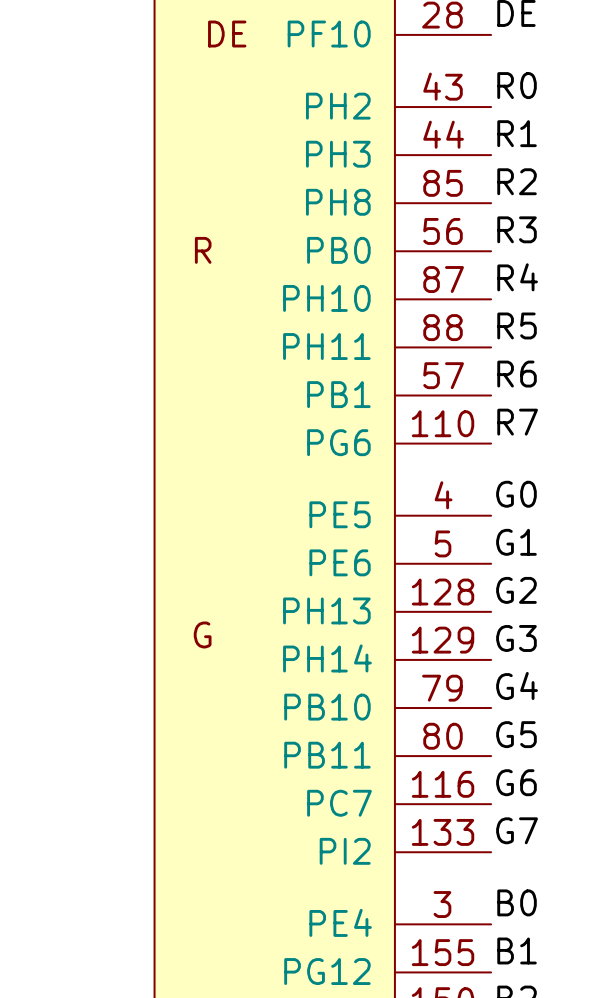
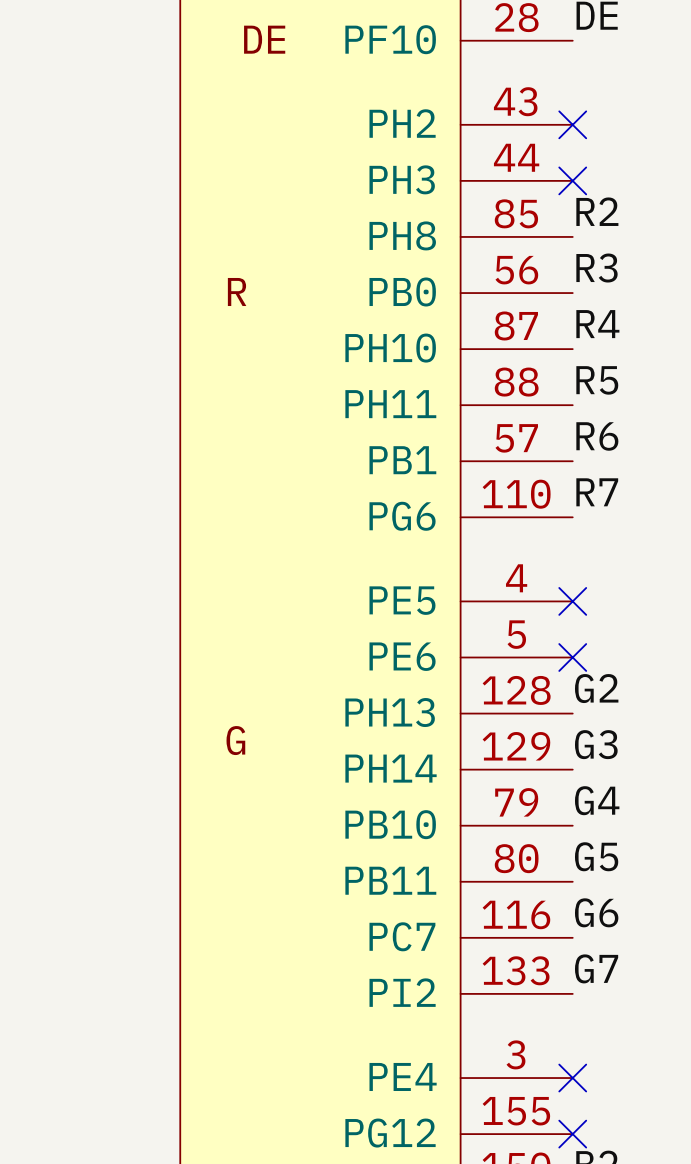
label: R0 (517, 85) -> none
no-connect mark: none -> (572, 124)
label: R1 (517, 133) -> none
no-connect mark: none -> (572, 180)
label: G0 (516, 494) -> none
no-connect mark: none -> (572, 601)
label: G1 (516, 542) -> none
no-connect mark: none -> (572, 657)
label: B0 (517, 902) -> none
no-connect mark: none -> (572, 1078)
label: B1 (517, 950) -> none
no-connect mark: none -> (572, 1134)

